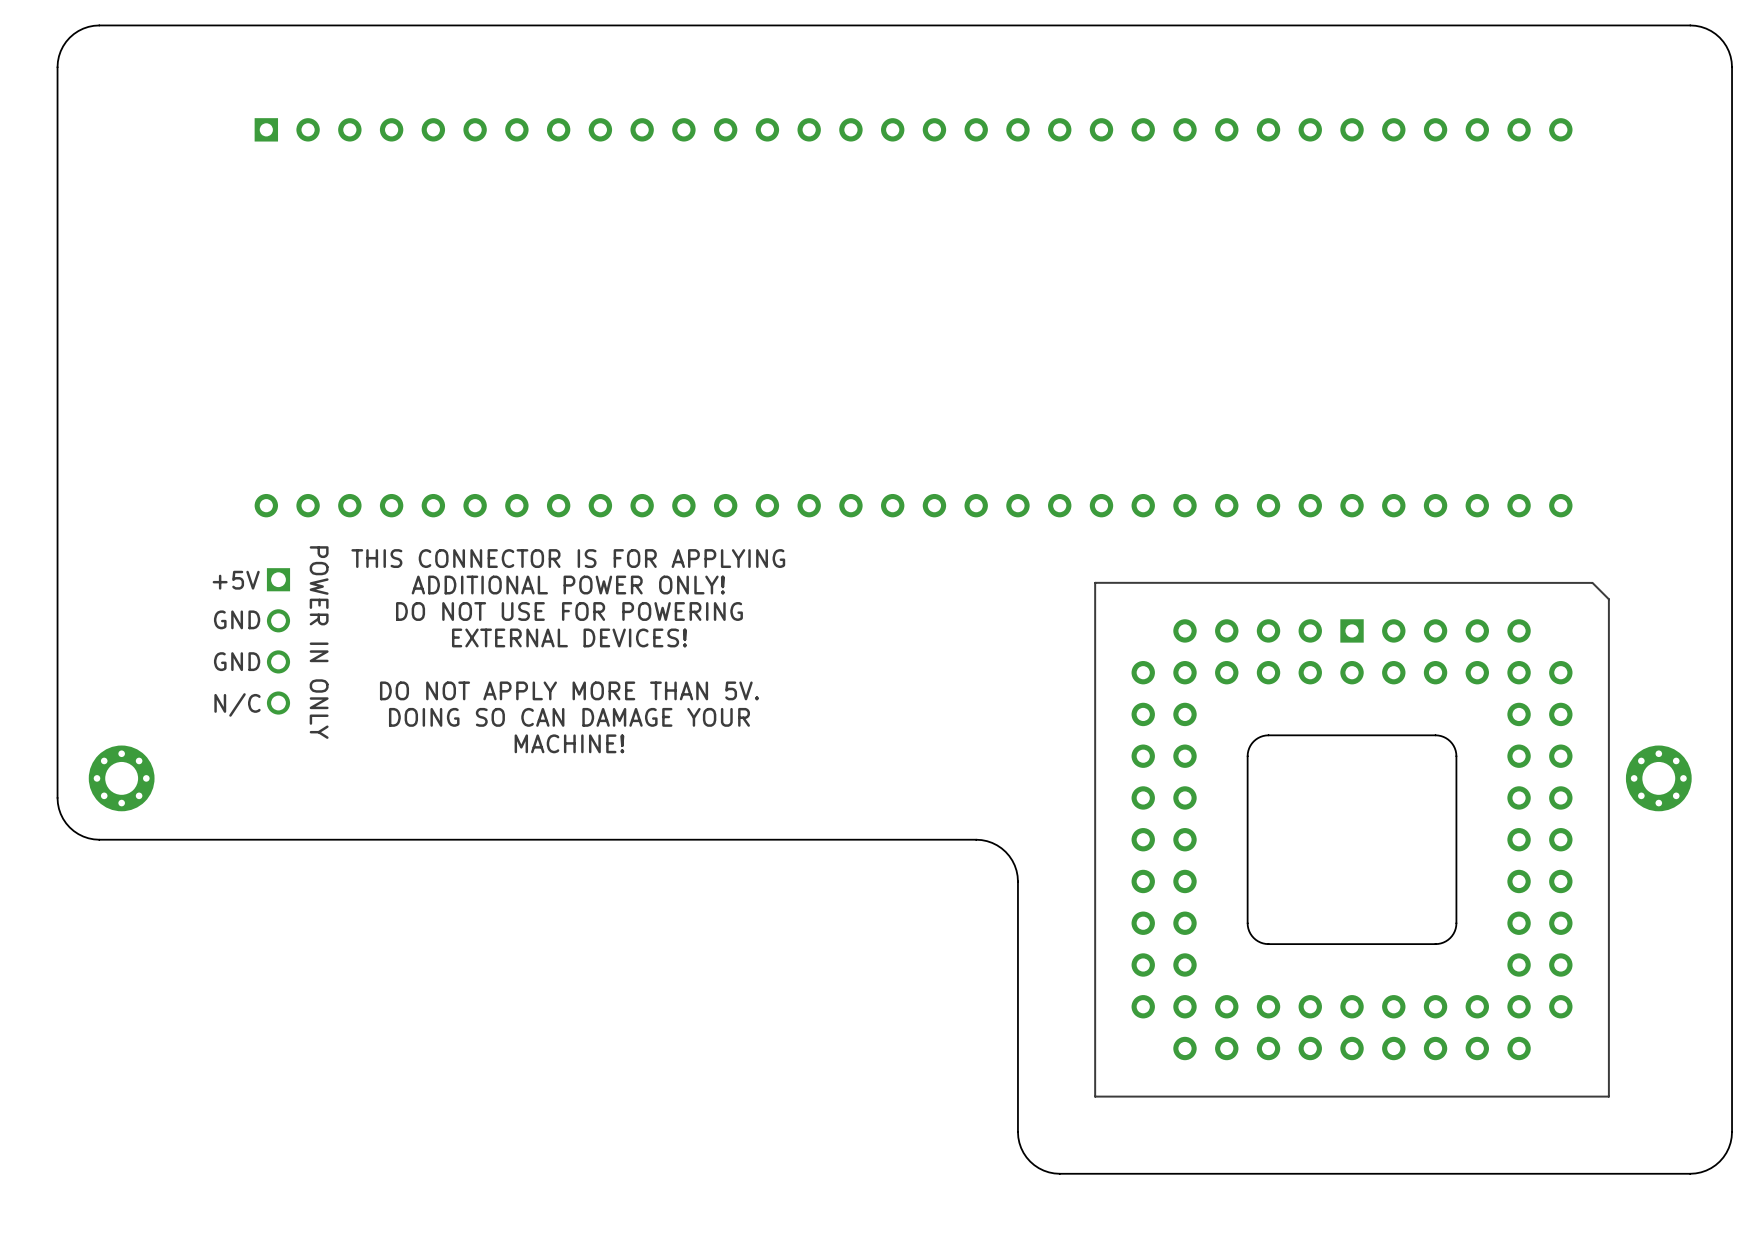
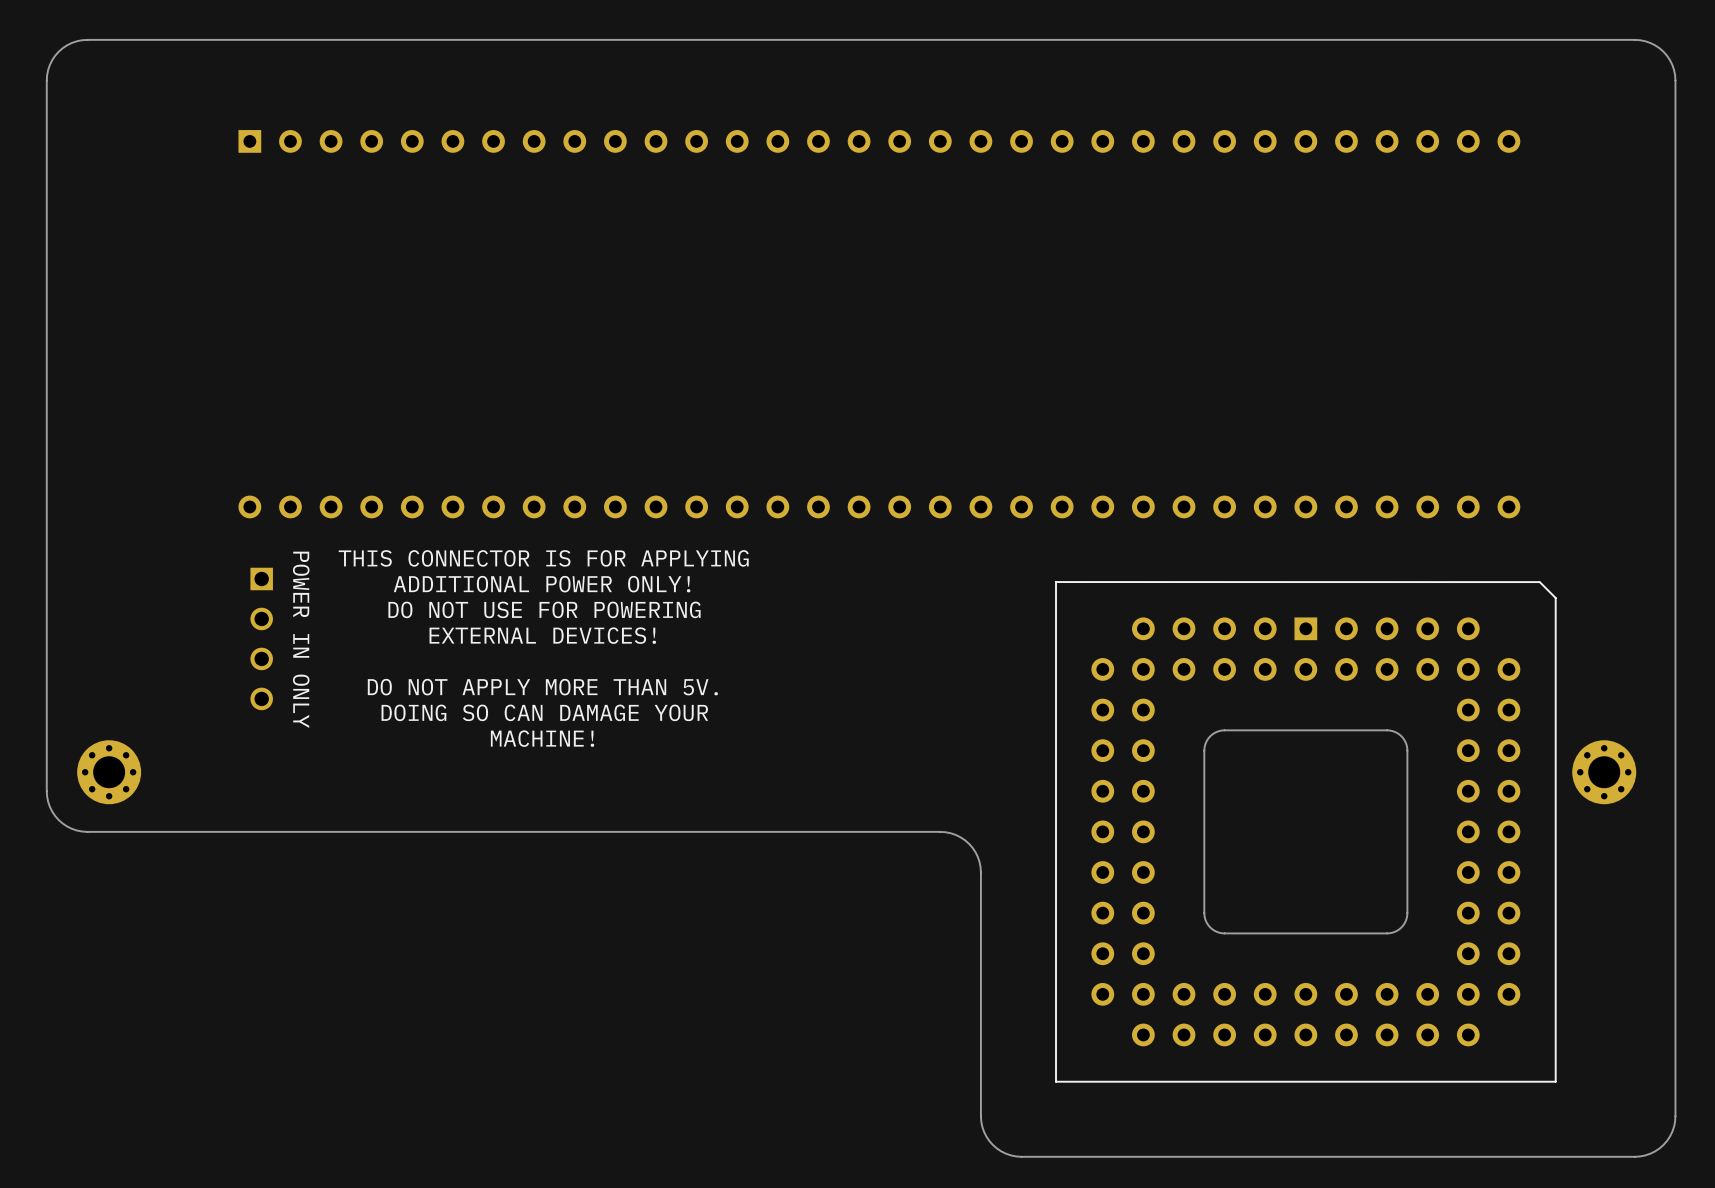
text: +5V (236, 580) -> none
text: GND (237, 619) -> none
text: GND (237, 661) -> none
text: N/C (237, 704) -> none

